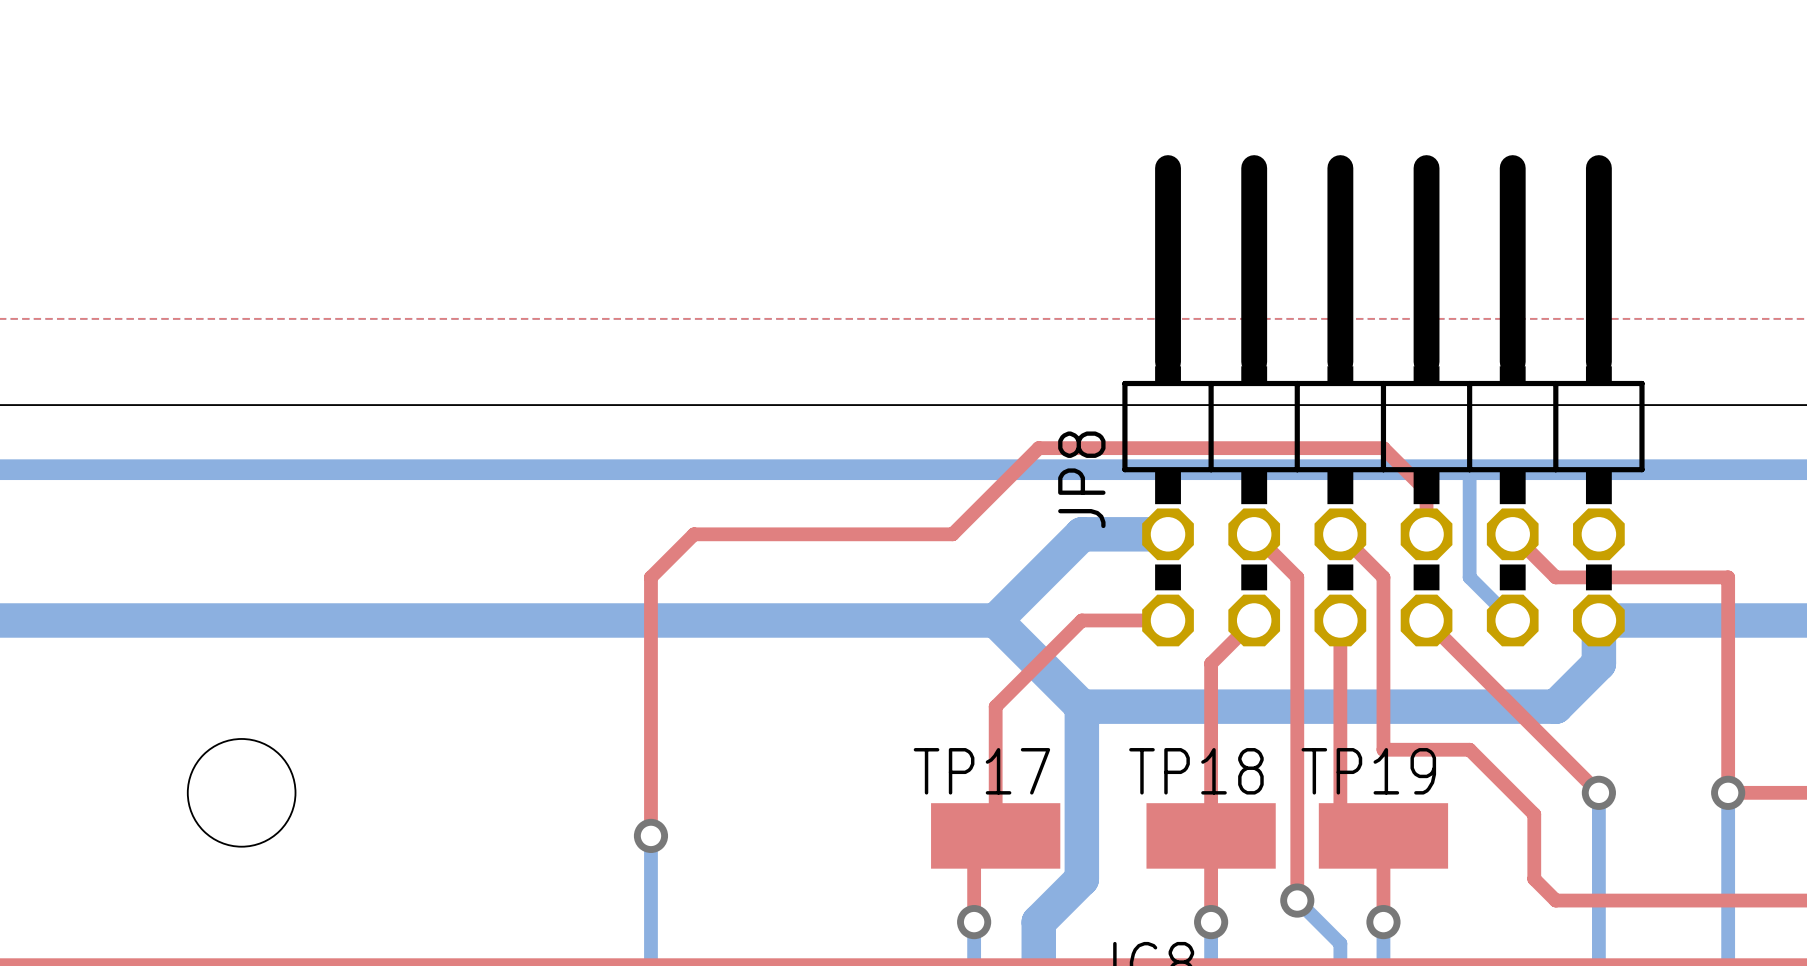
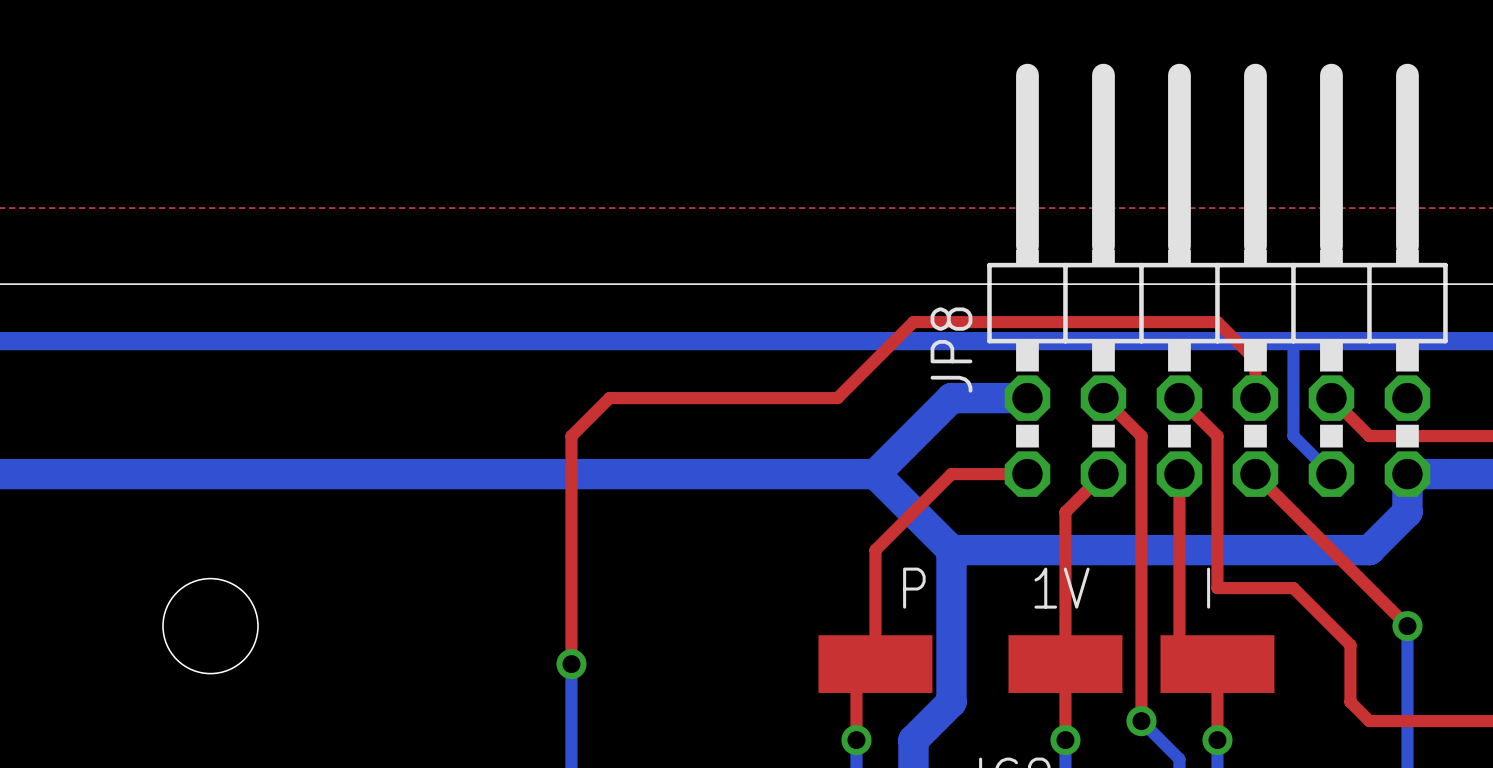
text: none -> P (914, 588)
text: none -> 1V (1062, 588)
text: none -> I (1208, 588)
TP17 name: TP17 (981, 771) -> none
TP18 name: TP18 (1196, 771) -> none
TP19 name: TP19 (1368, 771) -> none

